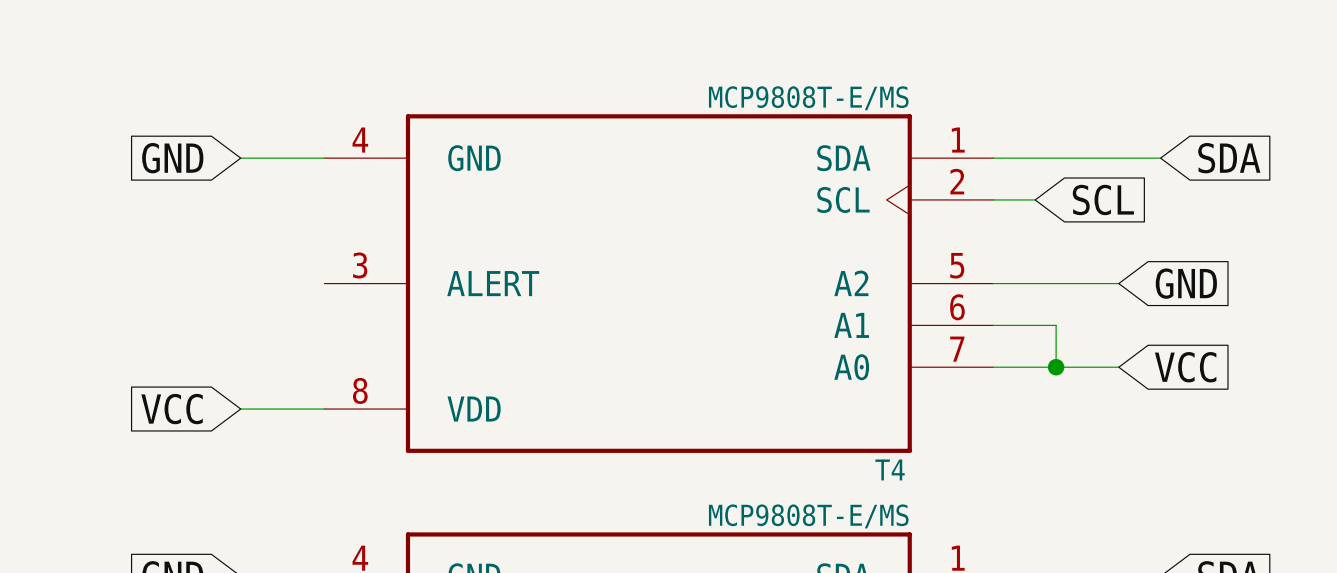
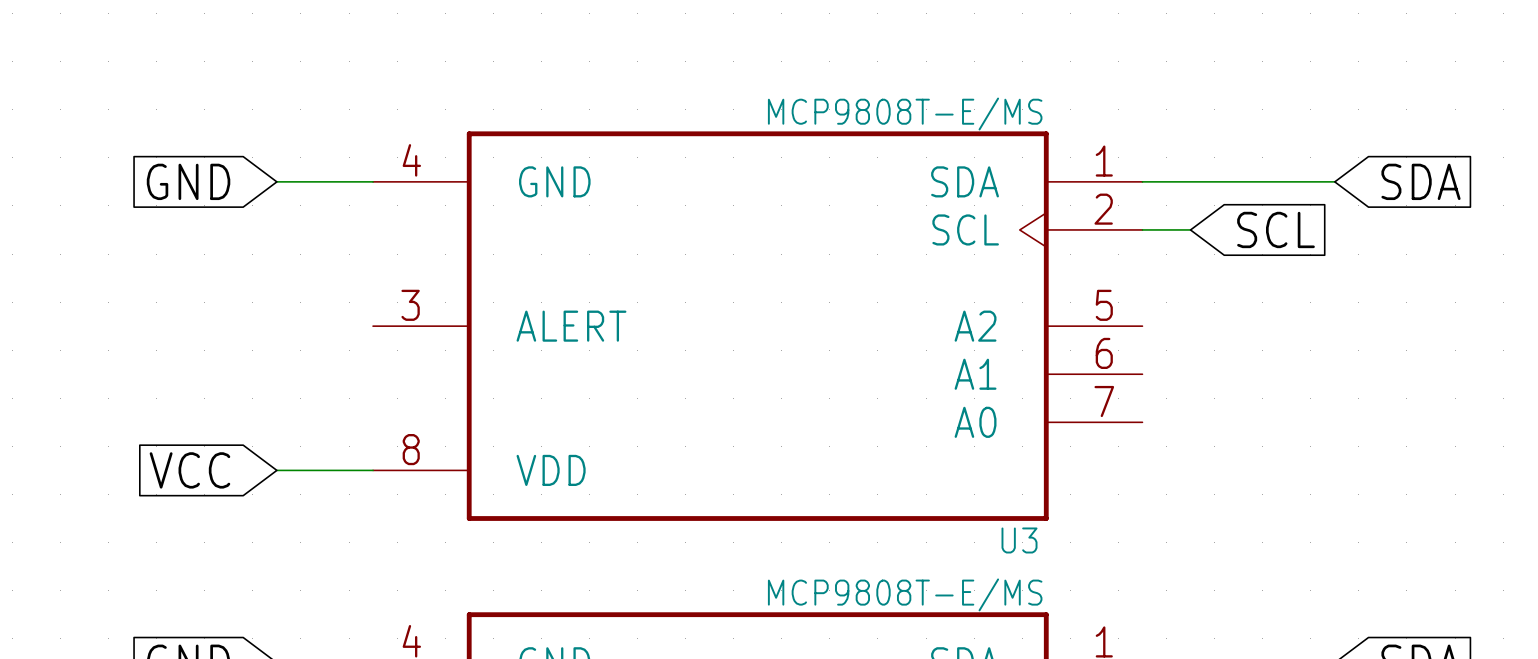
wire: (993, 283) (1118, 283) -> none
global label: GND (1186, 283) -> none
wire: (993, 325) (1056, 325) (1056, 367) -> none
wire: (993, 367) (1118, 367) -> none
junction: (1056, 367) -> none
global label: VCC (1185, 367) -> none
T4 name: T4 (890, 469) -> U3 (1019, 540)

